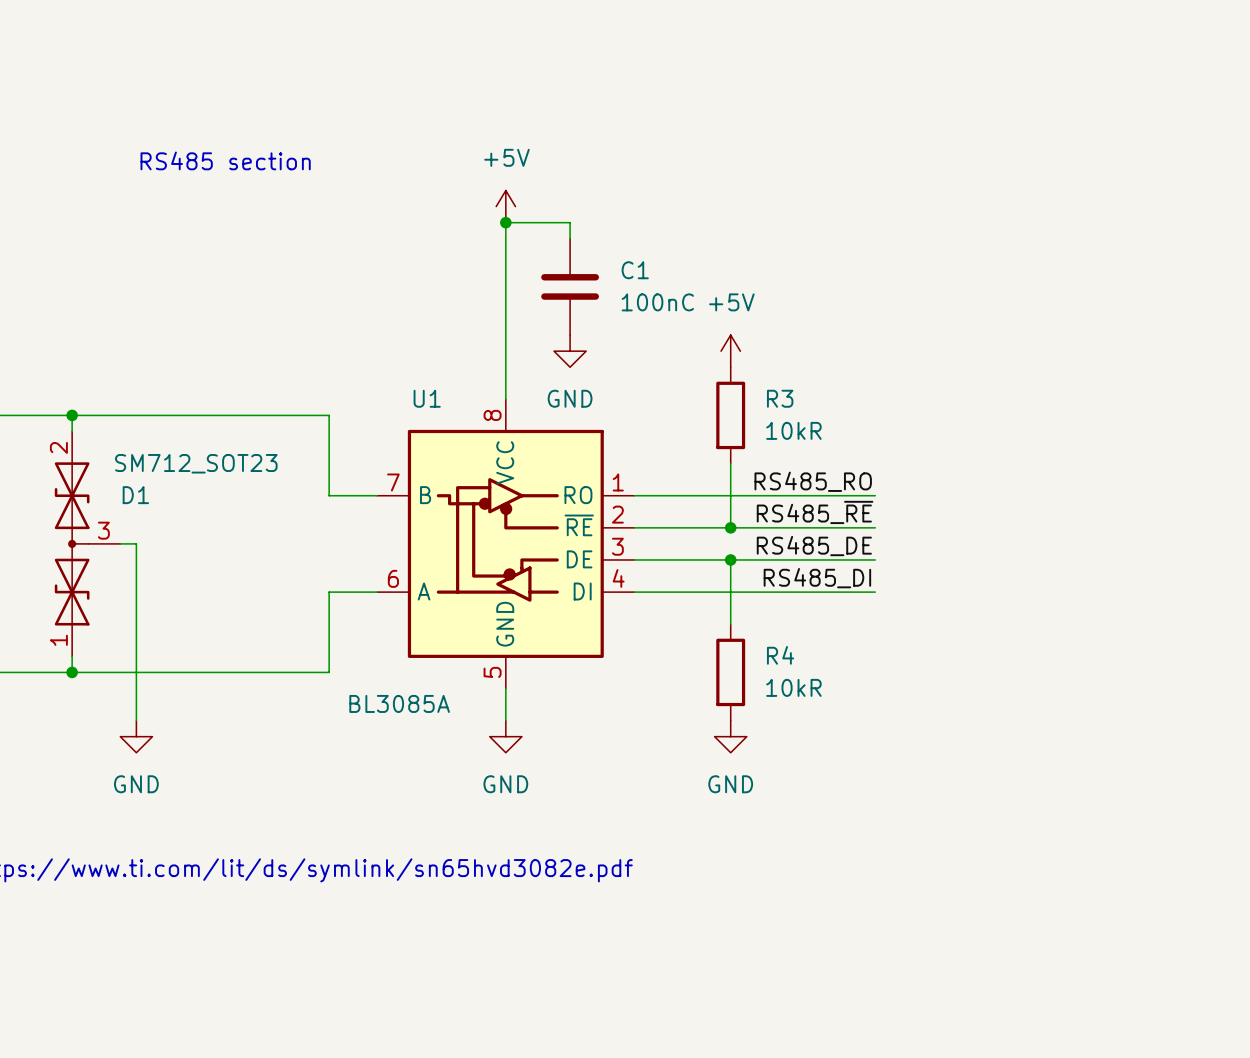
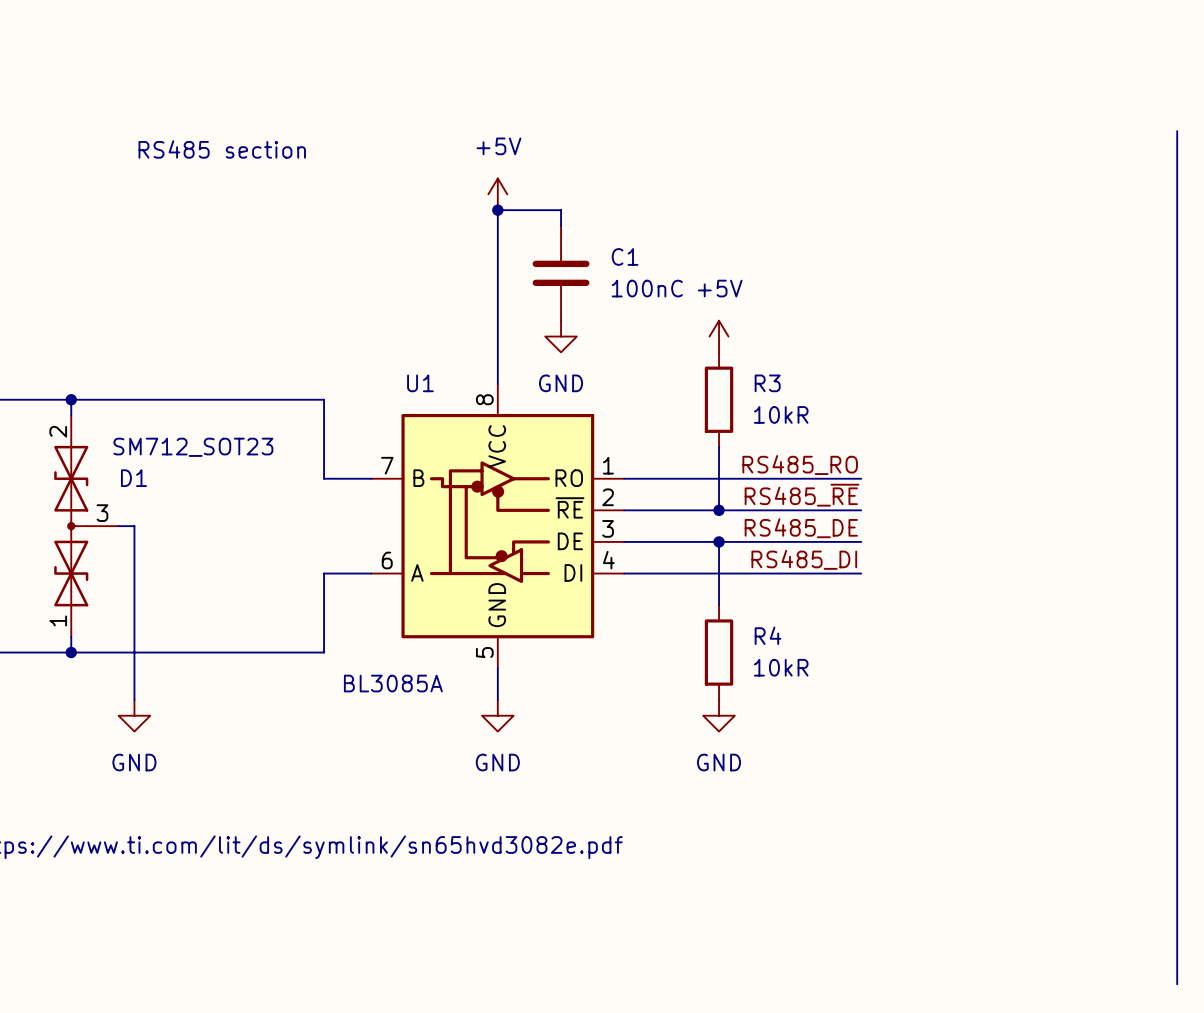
line: none -> (1177, 131) (1177, 984)

